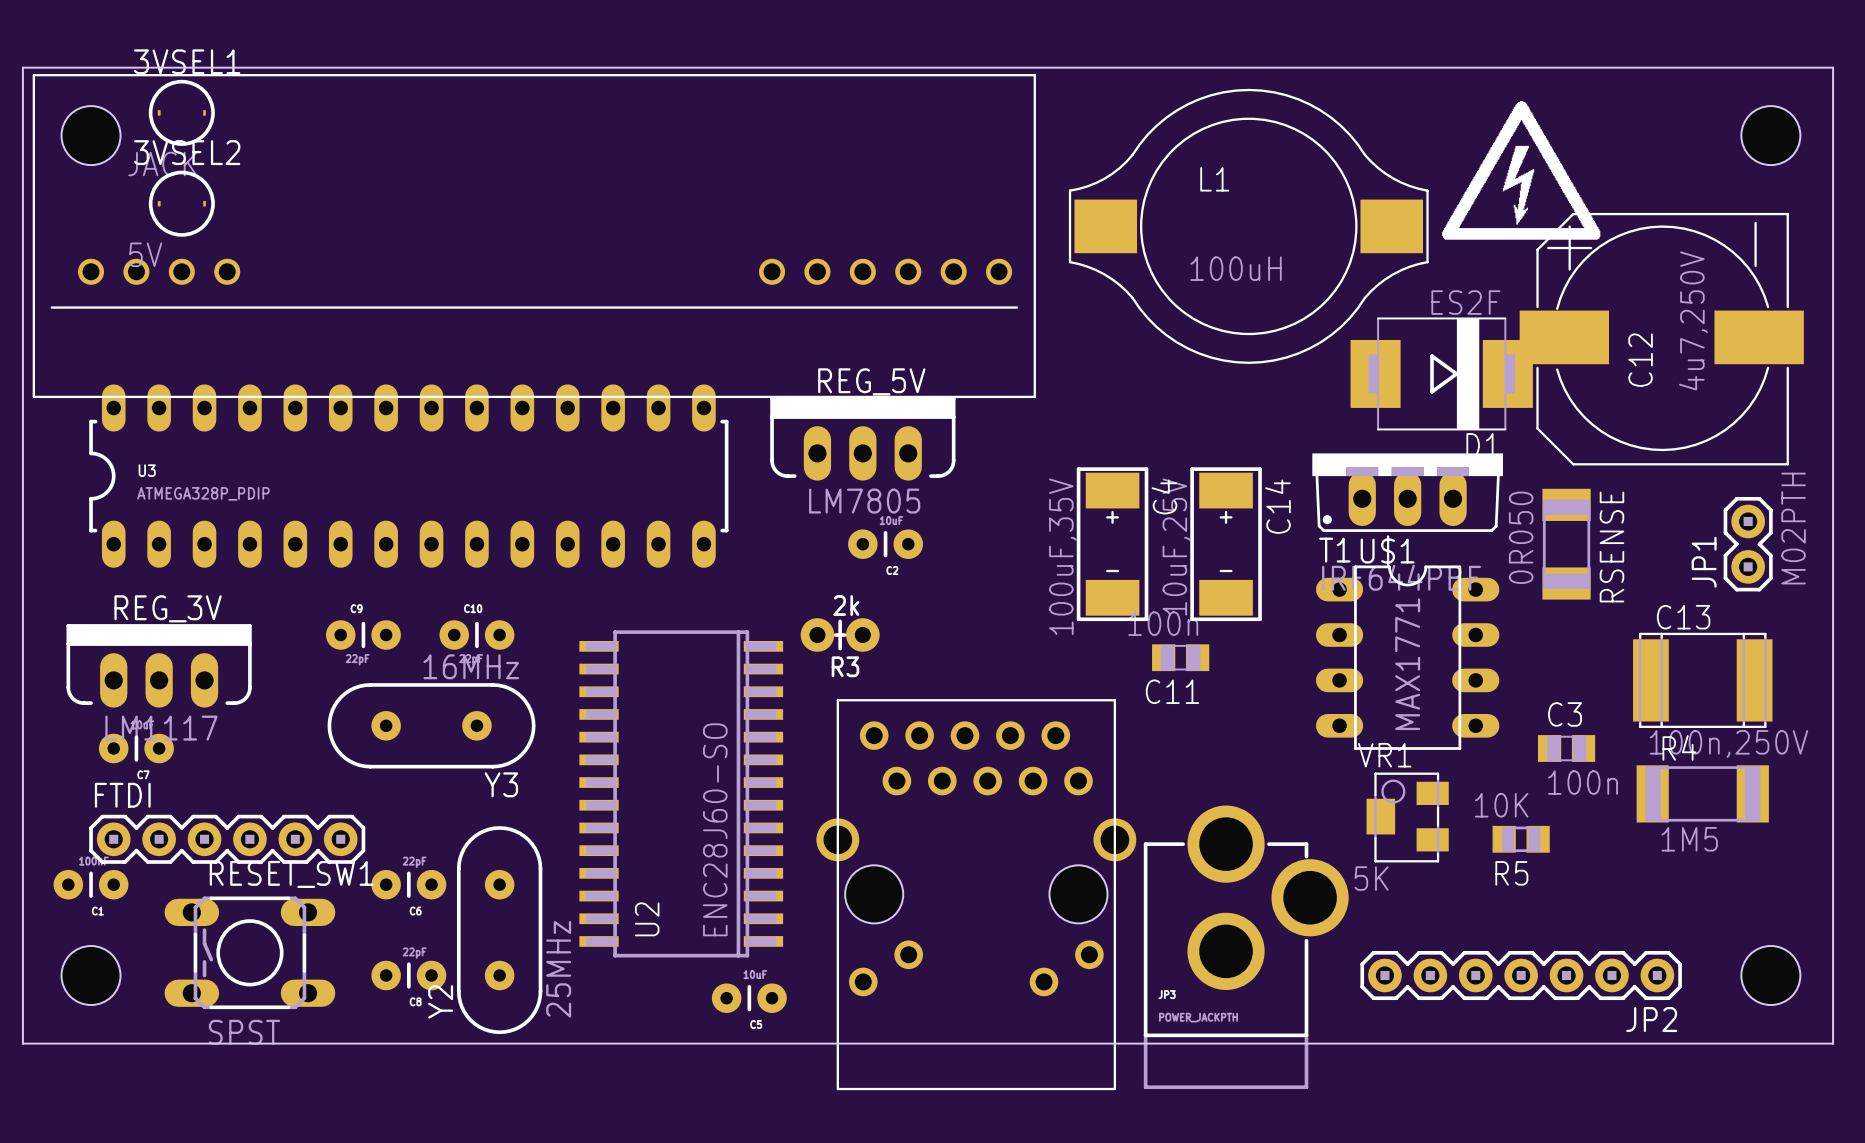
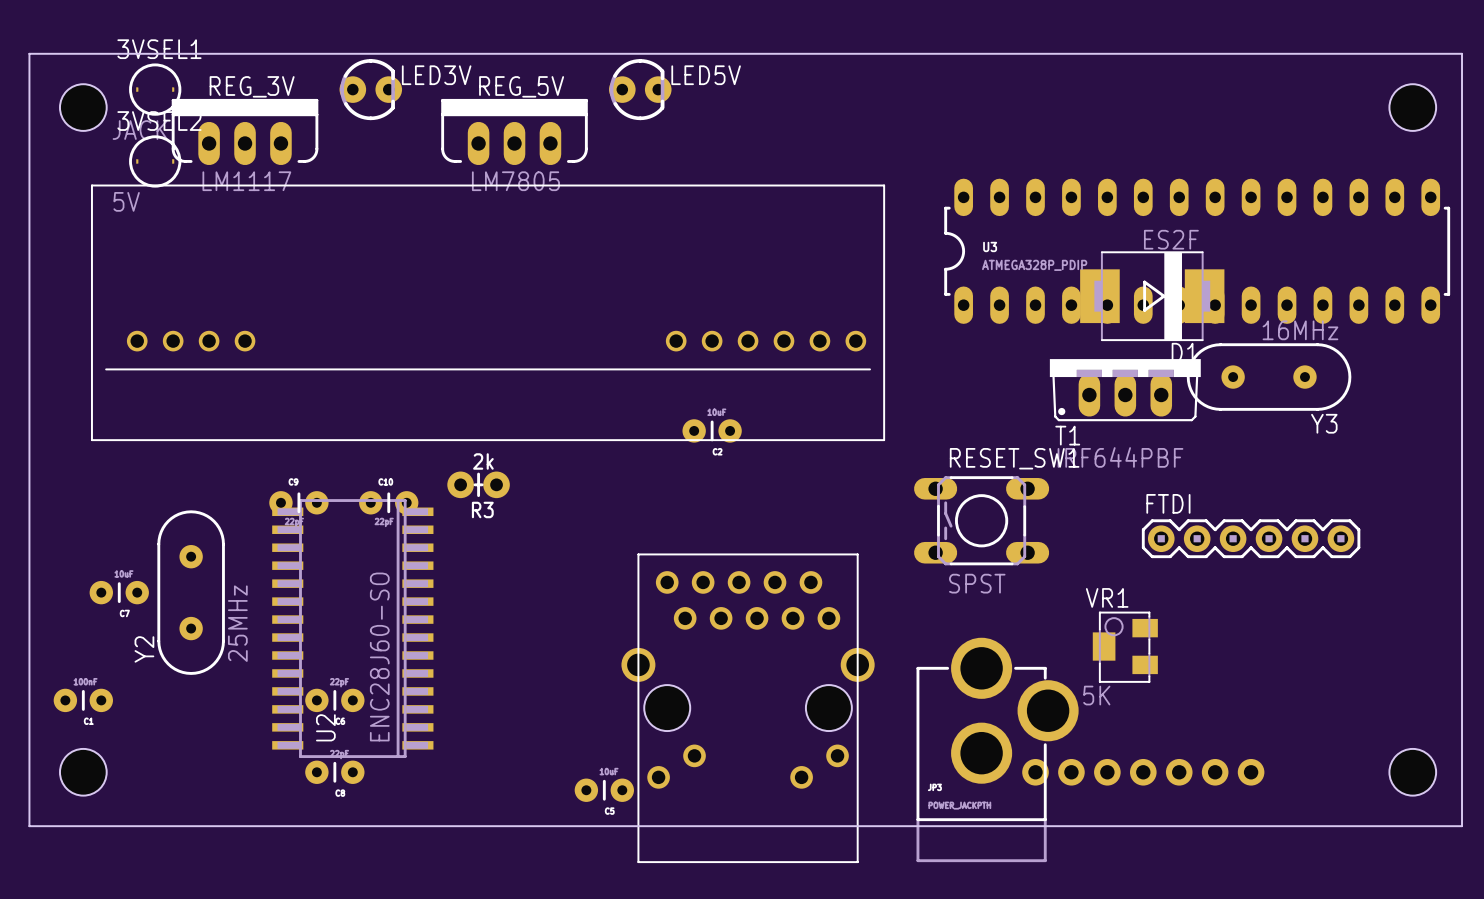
drawing: [1442, 101, 1601, 240] -> none
LED3V: none -> (370, 89)
LED5V: none -> (640, 89)
L1: 100uH (1248, 226) -> none
part position: (534, 236) -> (488, 312)
C12: 4u7,250V (1661, 339) -> none
REG_5V position: (862, 438) -> (514, 131)
U3 position: (408, 476) -> (1197, 251)
C4: 100uF,35V (1112, 544) -> none
C14: 10uF,25V (1226, 544) -> none
RSENSE: 0R050 (1566, 544) -> none
JP1: M02PTH (1748, 544) -> none
R3 position: (840, 635) -> (478, 484)
C11: 100n (1180, 657) -> none
U$1: MAX1771 (1407, 657) -> none
REG_3V position: (159, 665) -> (245, 131)
FTDI: none -> (1251, 538)
C13: 100n,250V (1702, 680) -> none
Y3 position: (431, 725) -> (1269, 377)
C3: 100n (1566, 748) -> none
U2 position: (681, 793) -> (352, 628)
R4: 1M5 (1702, 793) -> none
FTDI: (227, 839) -> none
R5: 10K (1521, 839) -> none
part position: (976, 894) -> (748, 708)
Y2 position: (499, 930) -> (191, 592)
RESET_SW1 position: (249, 952) -> (981, 520)
JP2 side: top (1521, 975) -> bottom (1143, 772)

